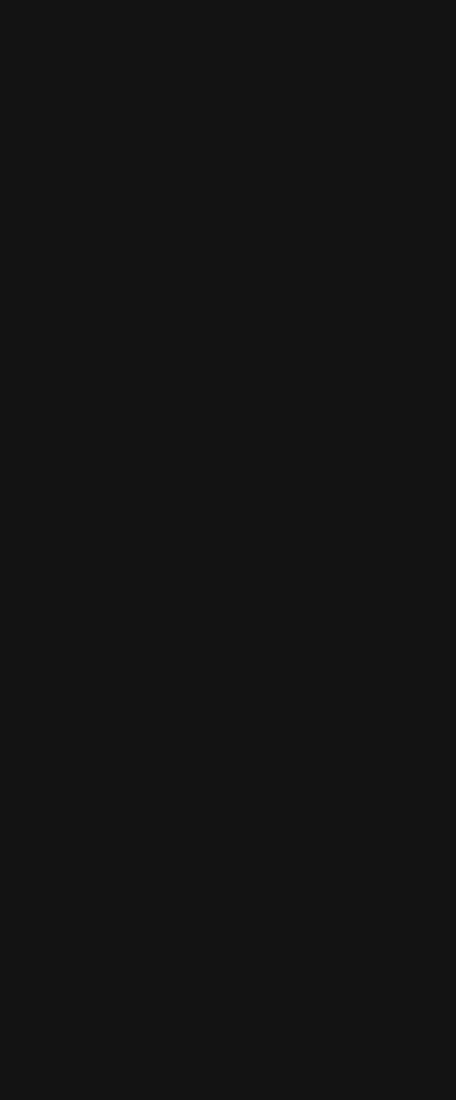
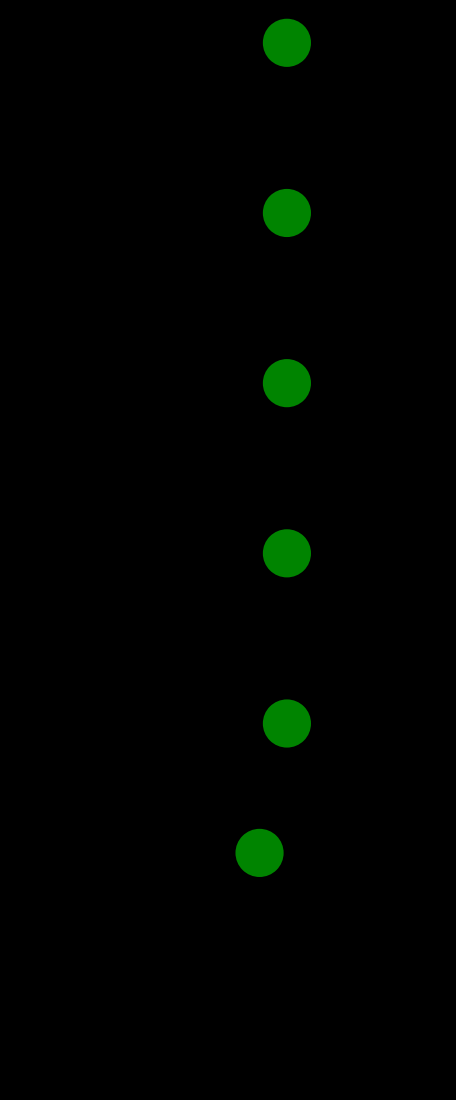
part: none -> (286, 42)
part: none -> (286, 212)
part: none -> (286, 383)
part: none -> (286, 553)
part: none -> (286, 723)
part: none -> (259, 852)

